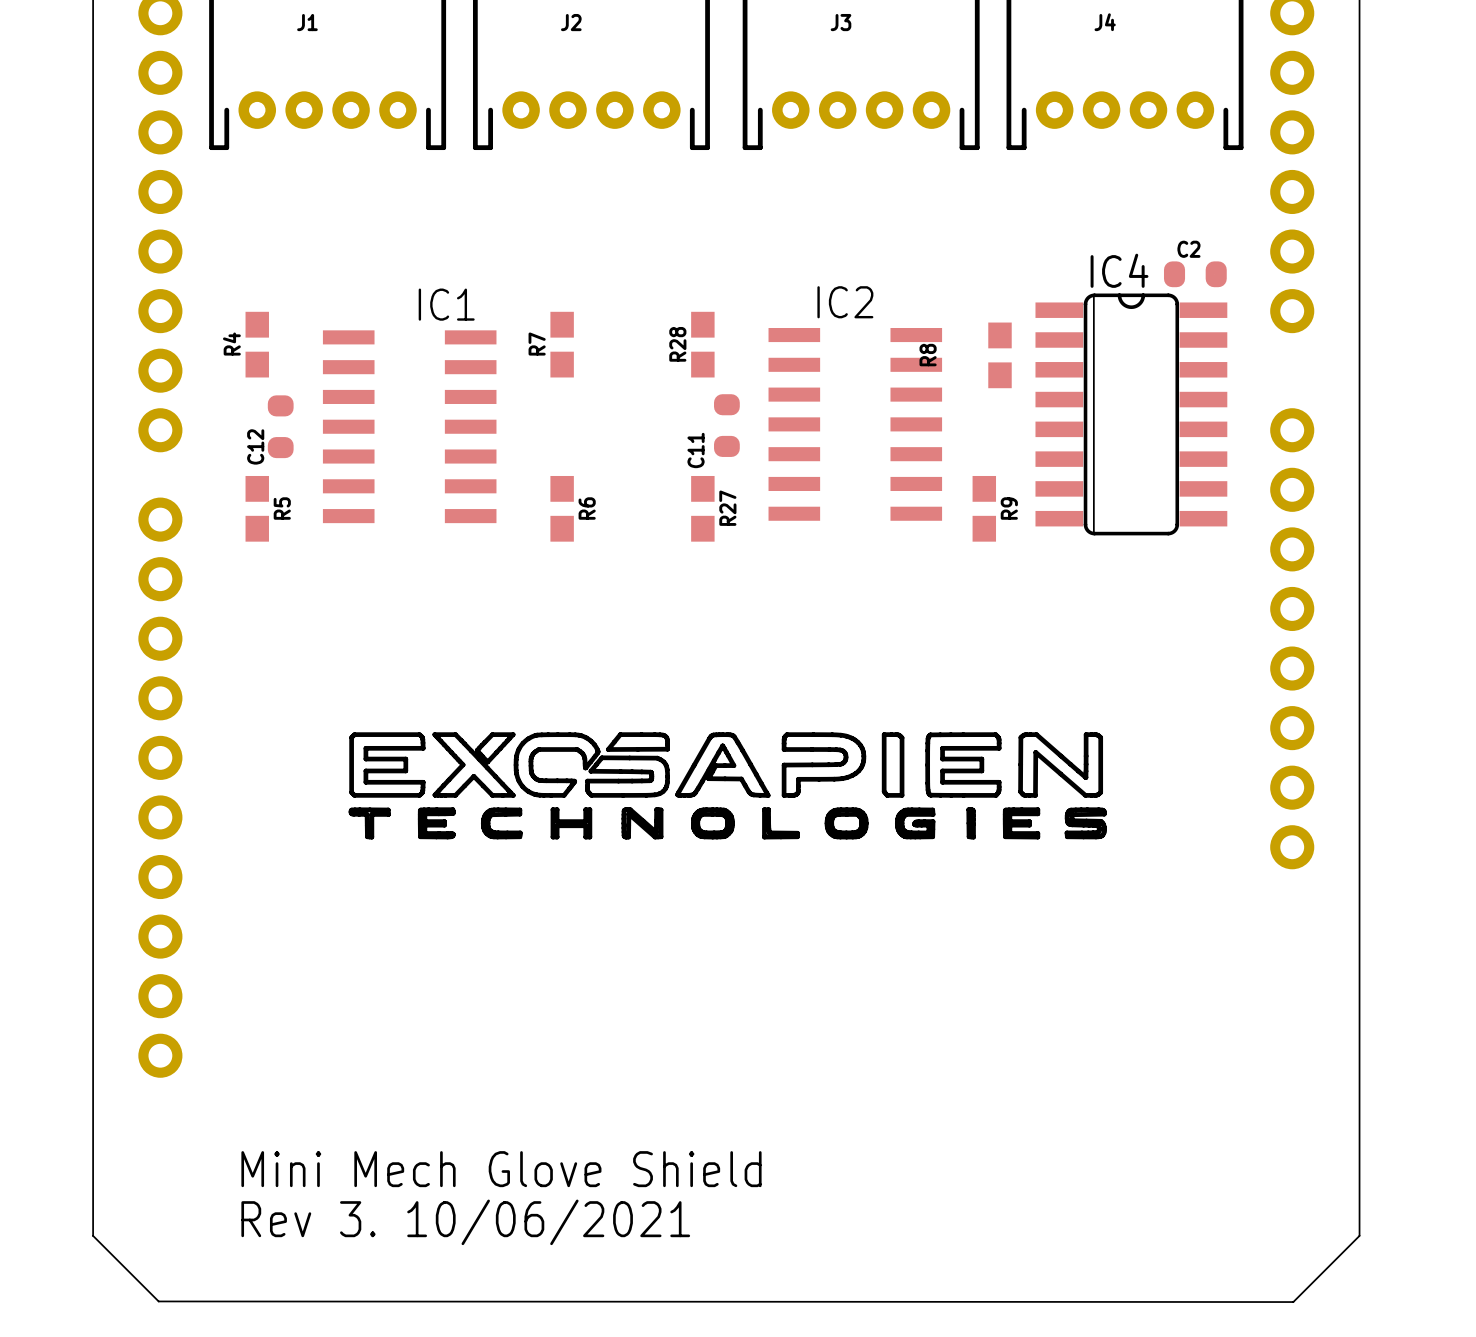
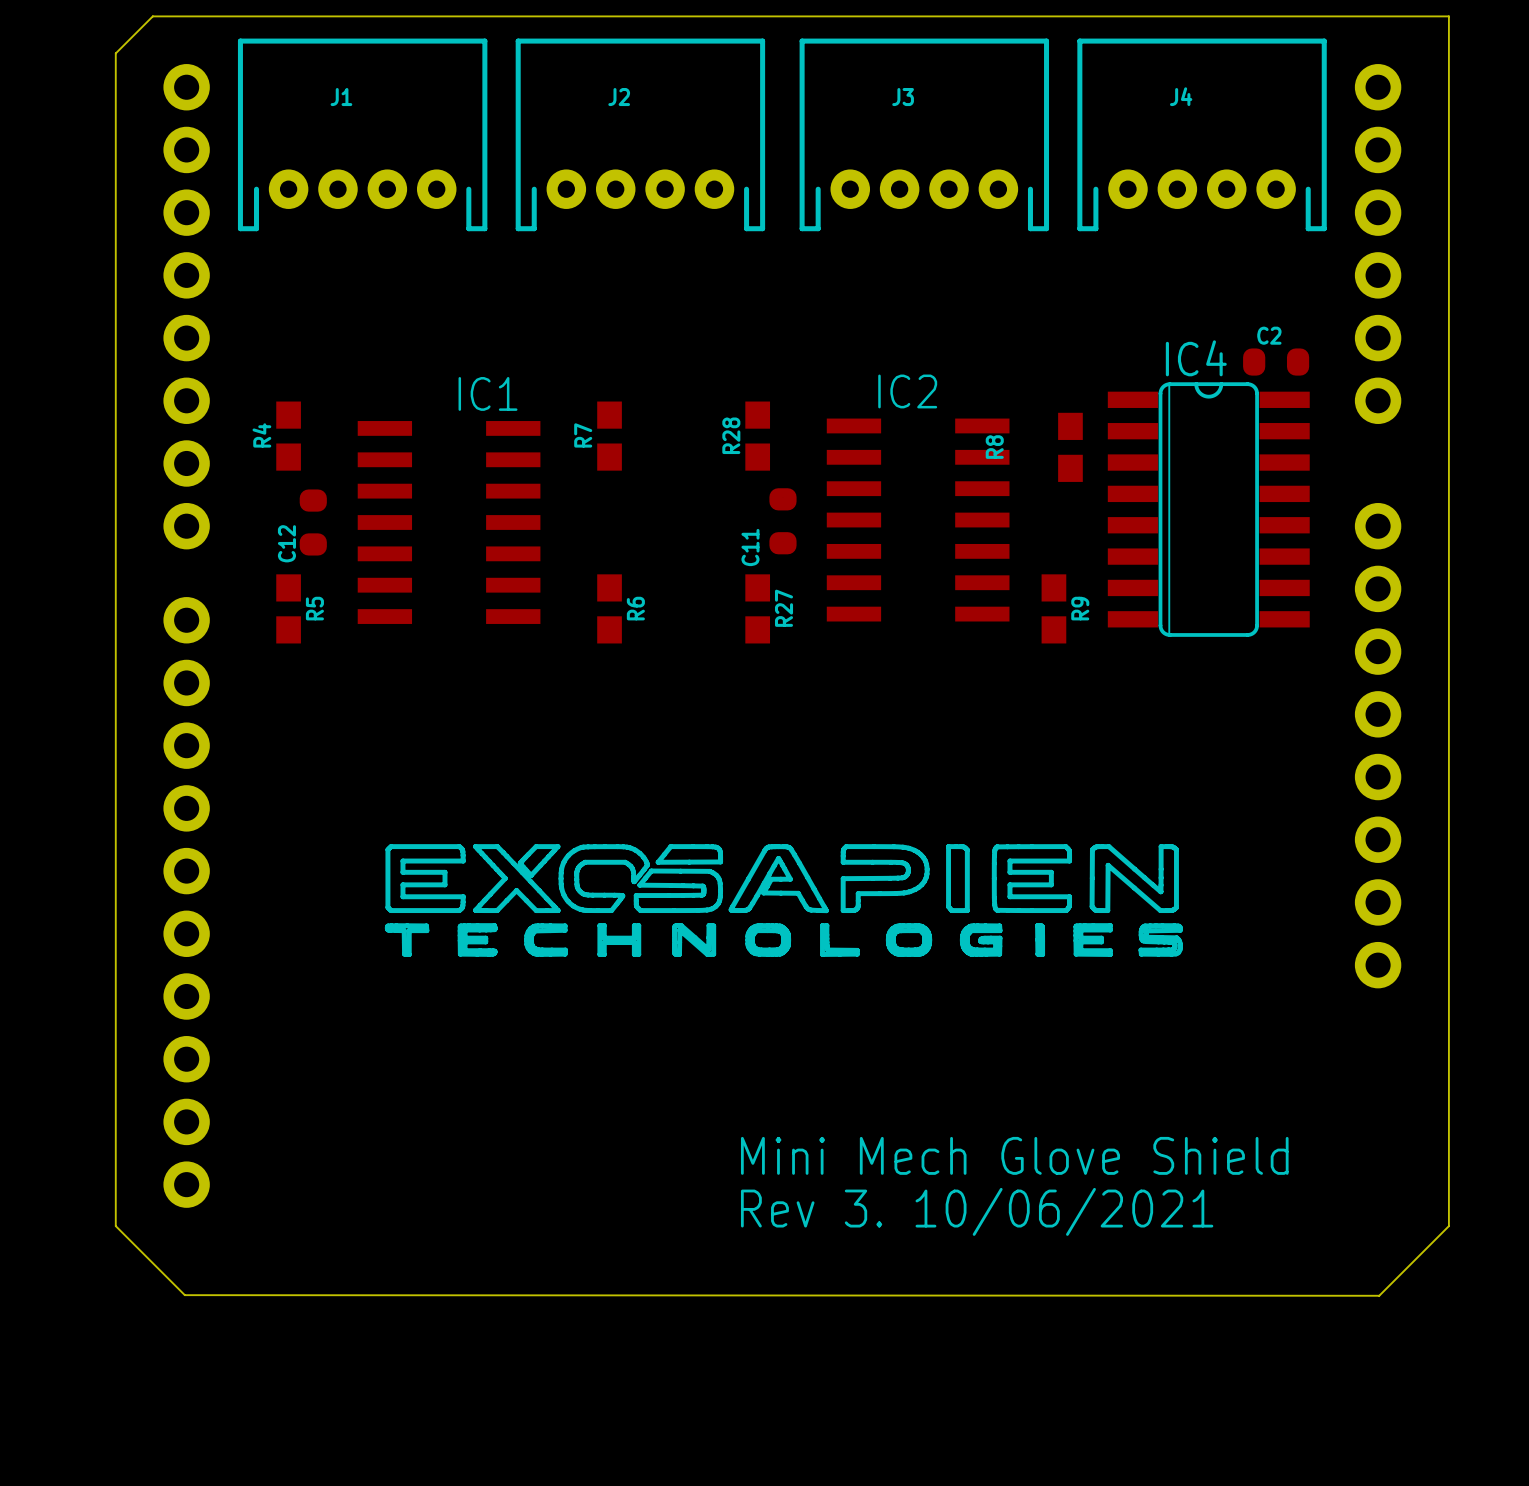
board edge: (93, 1095) (93, 1235) (158, 1301) (1293, 1302) (1359, 1235) (1359, 1095) -> (115, 1226) (184, 1295) (1379, 1295) (1448, 1226)
text position: Mini Mech Glove Shield (501, 1169) -> Mini Mech Glove Shield (1014, 1155)
text position: Rev 3. 10/06/2021 (465, 1222) -> Rev 3. 10/06/2021 (977, 1211)

